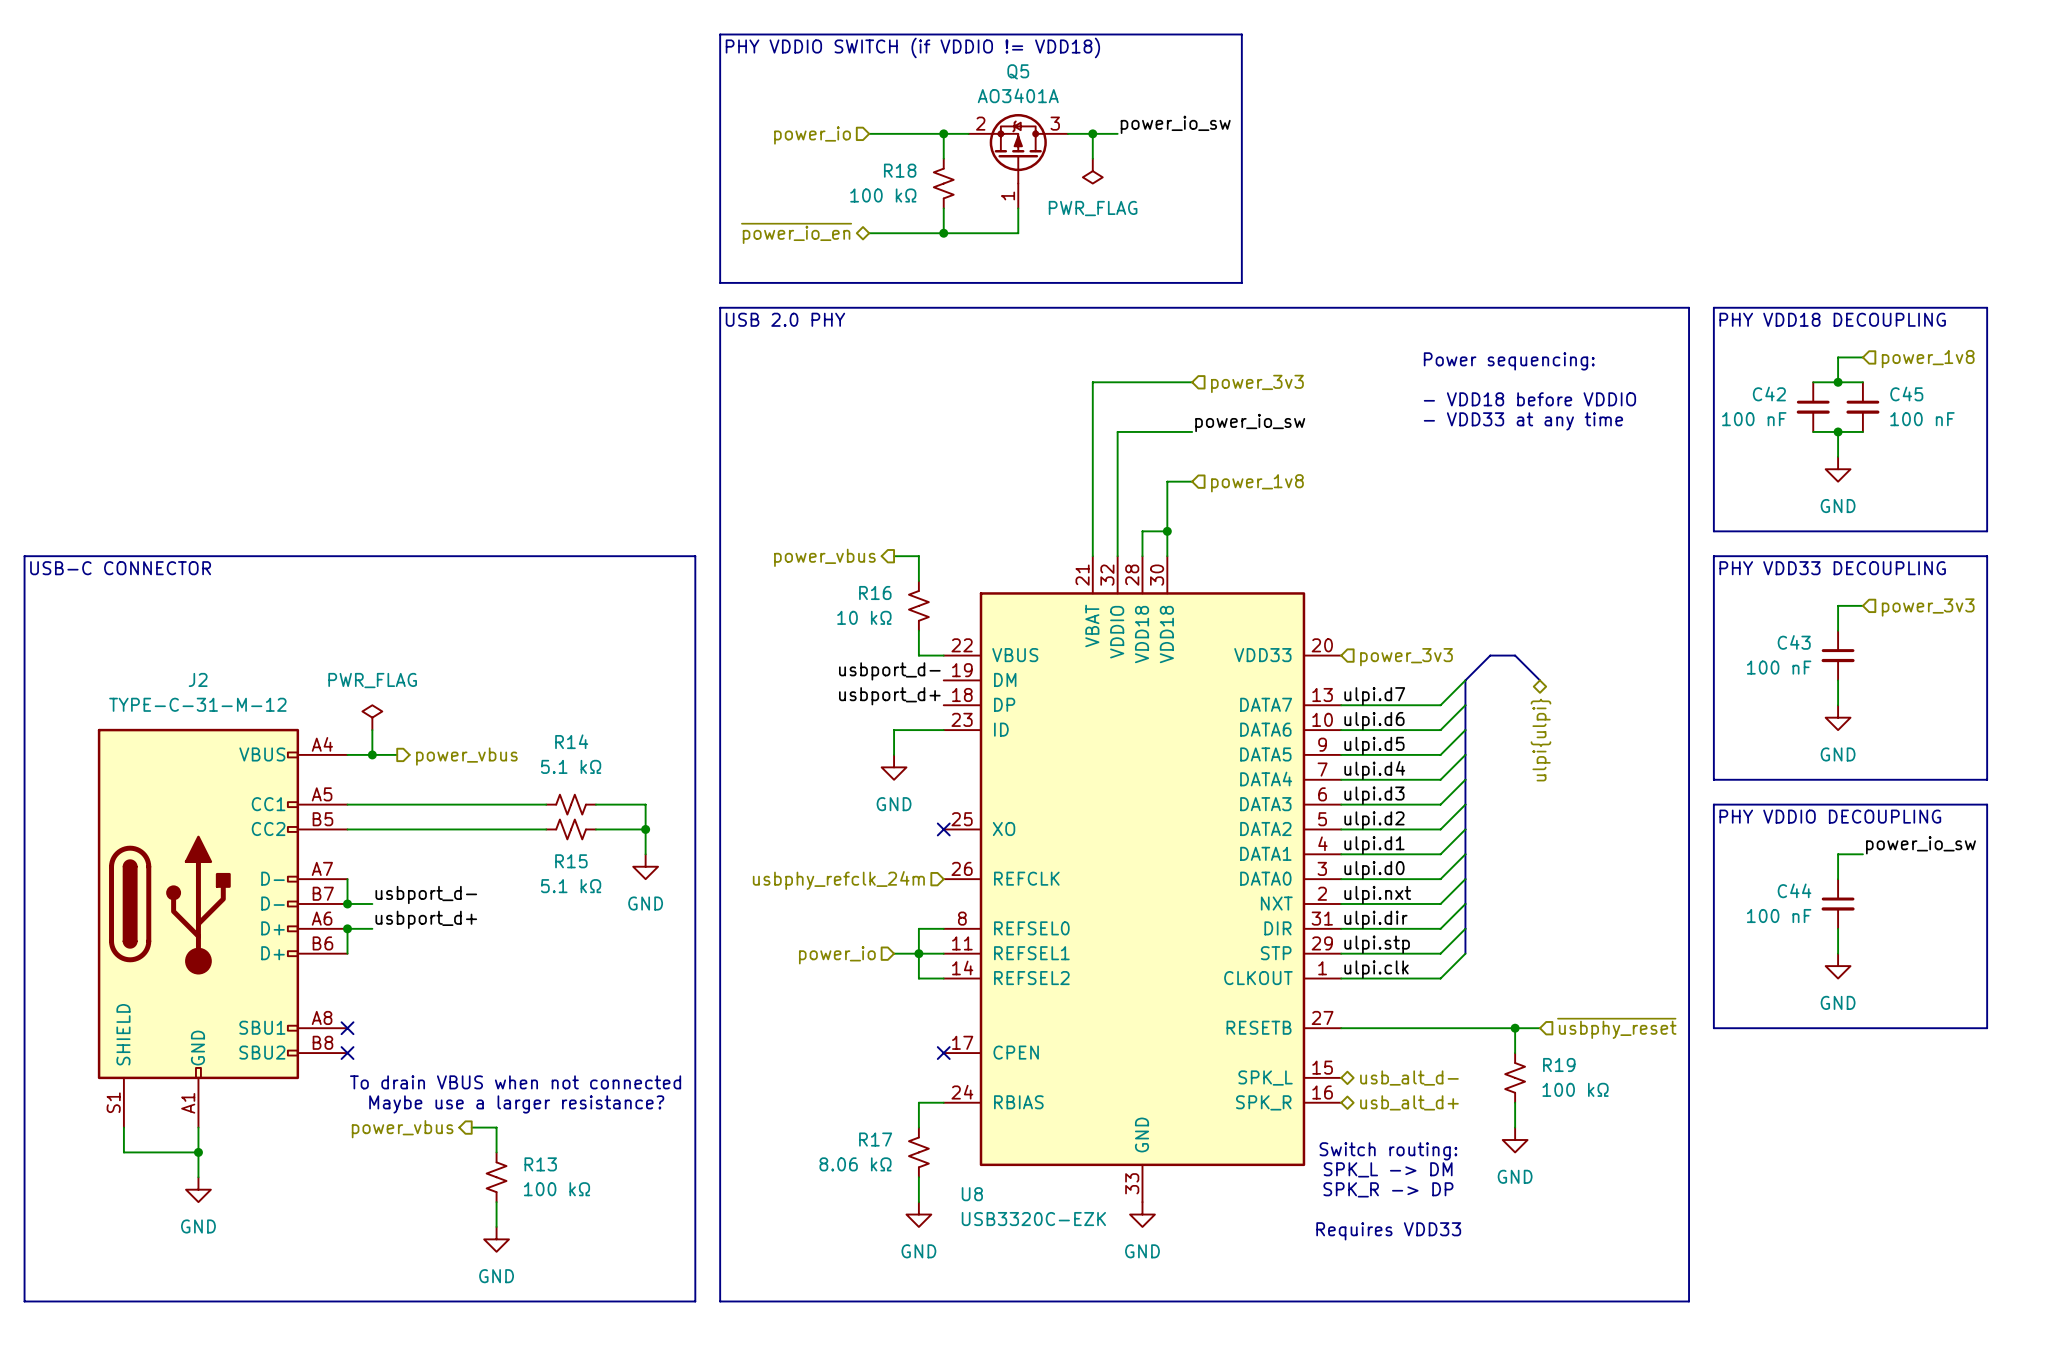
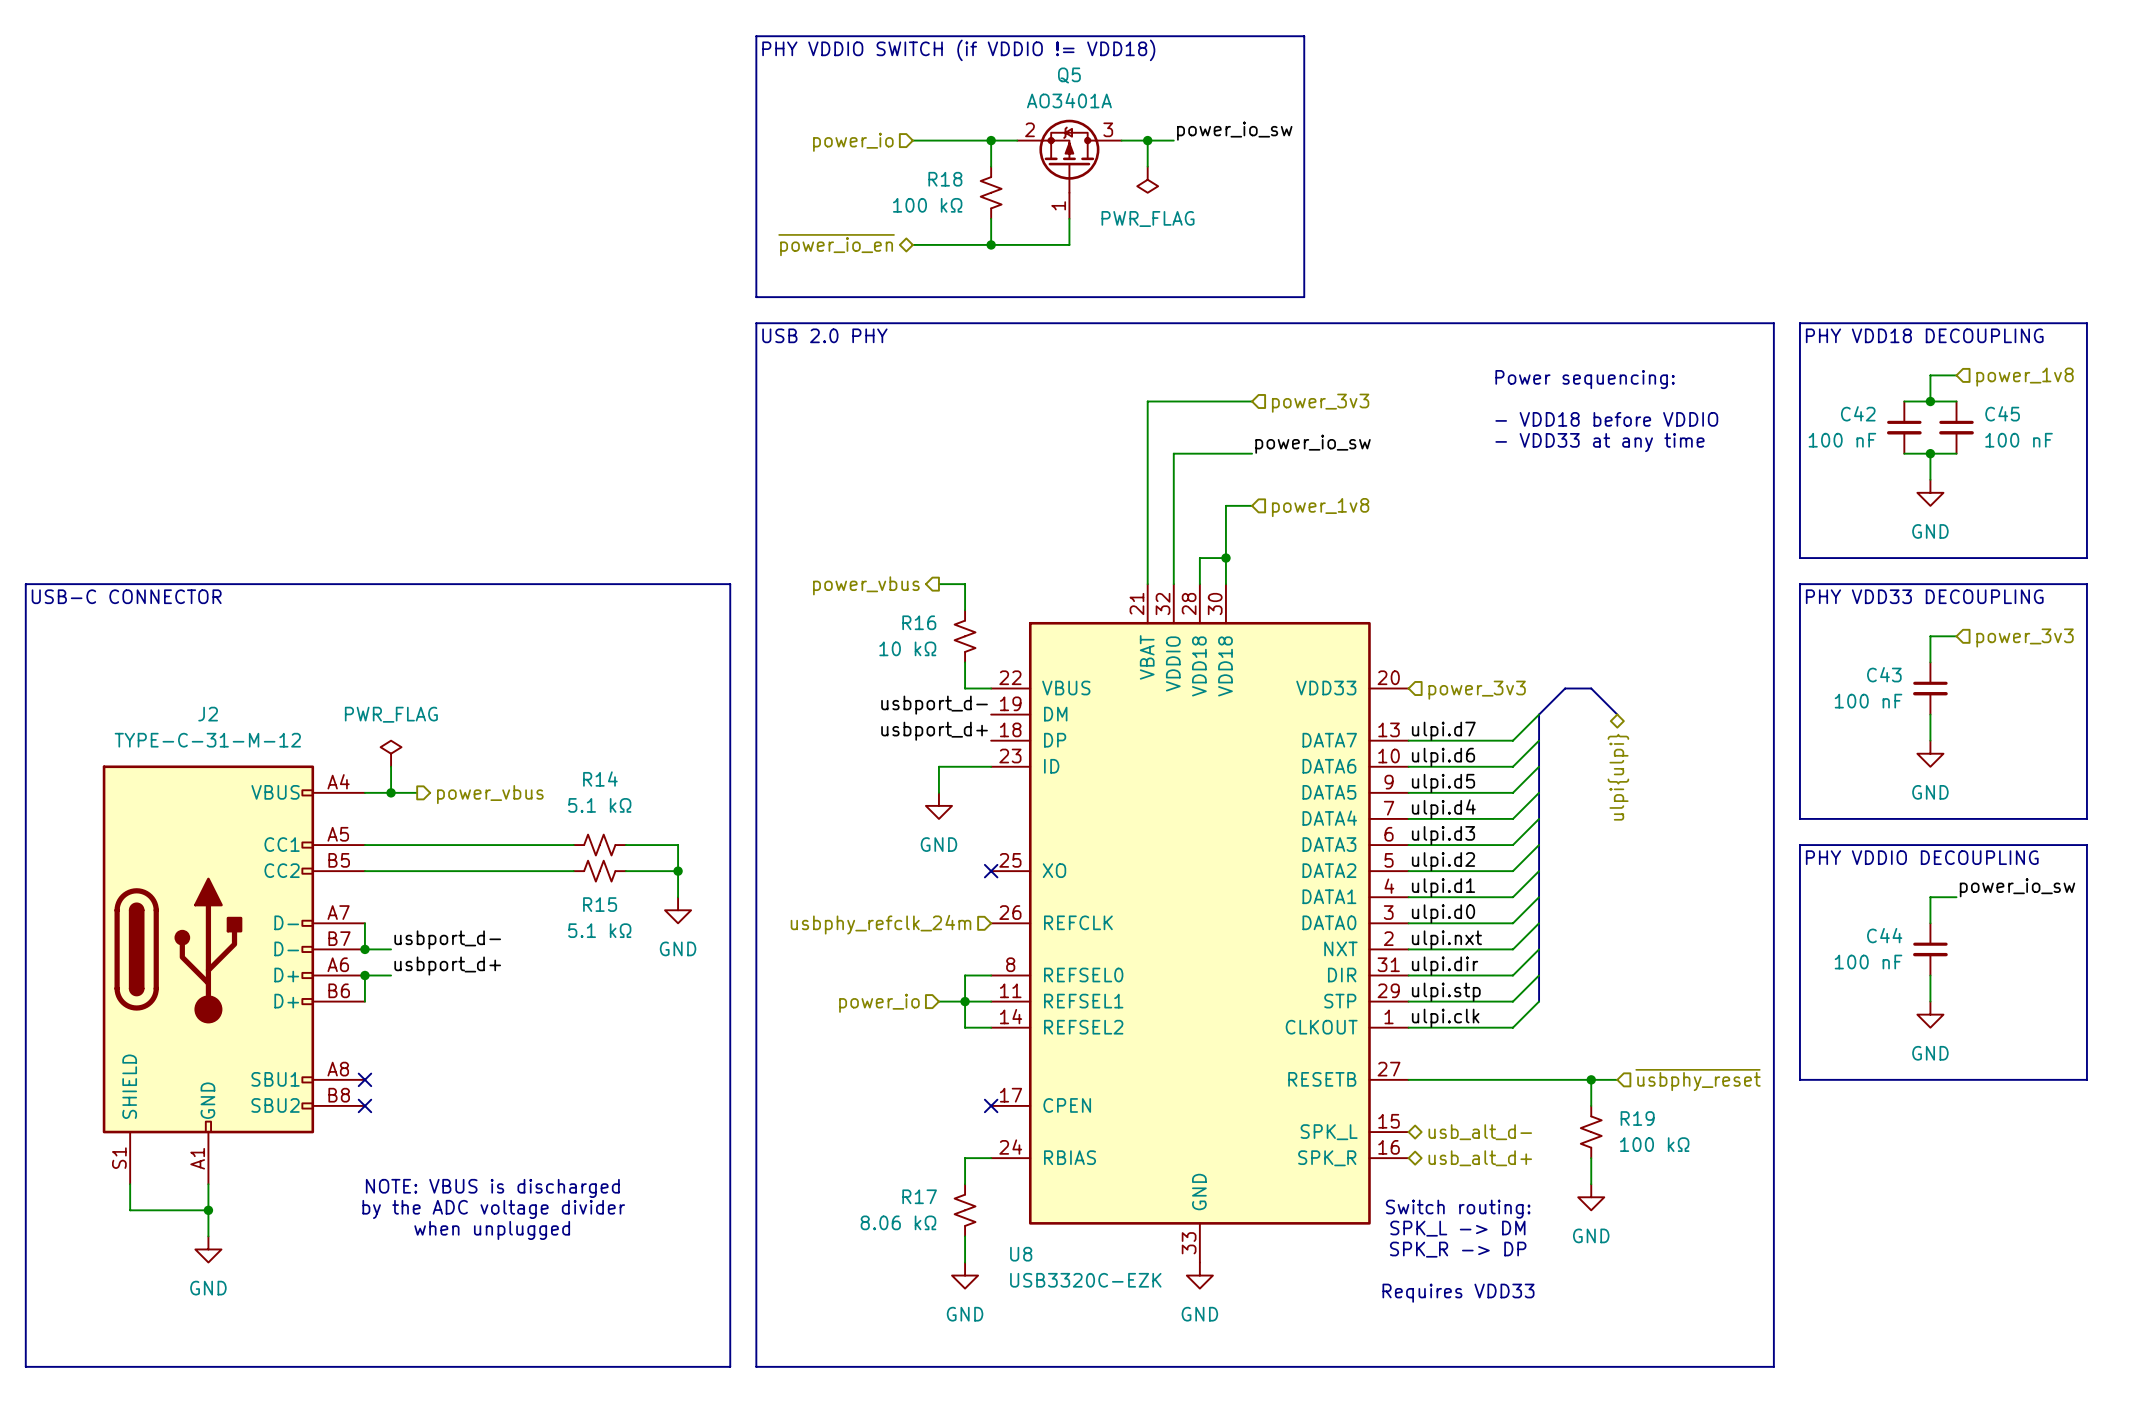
text: To drain VBUS when not connected (515, 1082) -> none
text: Maybe use a larger resistance? (516, 1104) -> none
wire: (471, 1127) (496, 1127) (496, 1152) -> none
hierarchical label: power_vbus (402, 1129) -> none
text: none -> NOTE: VBUS is discharged (492, 1188)
text: none -> by the ADC voltage divider (493, 1209)
text: none -> when unplugged (492, 1230)
R13: 100 kΩ (496, 1177) -> none
wire: (496, 1202) (496, 1226) -> none
power symbol: GND (496, 1239) -> none

